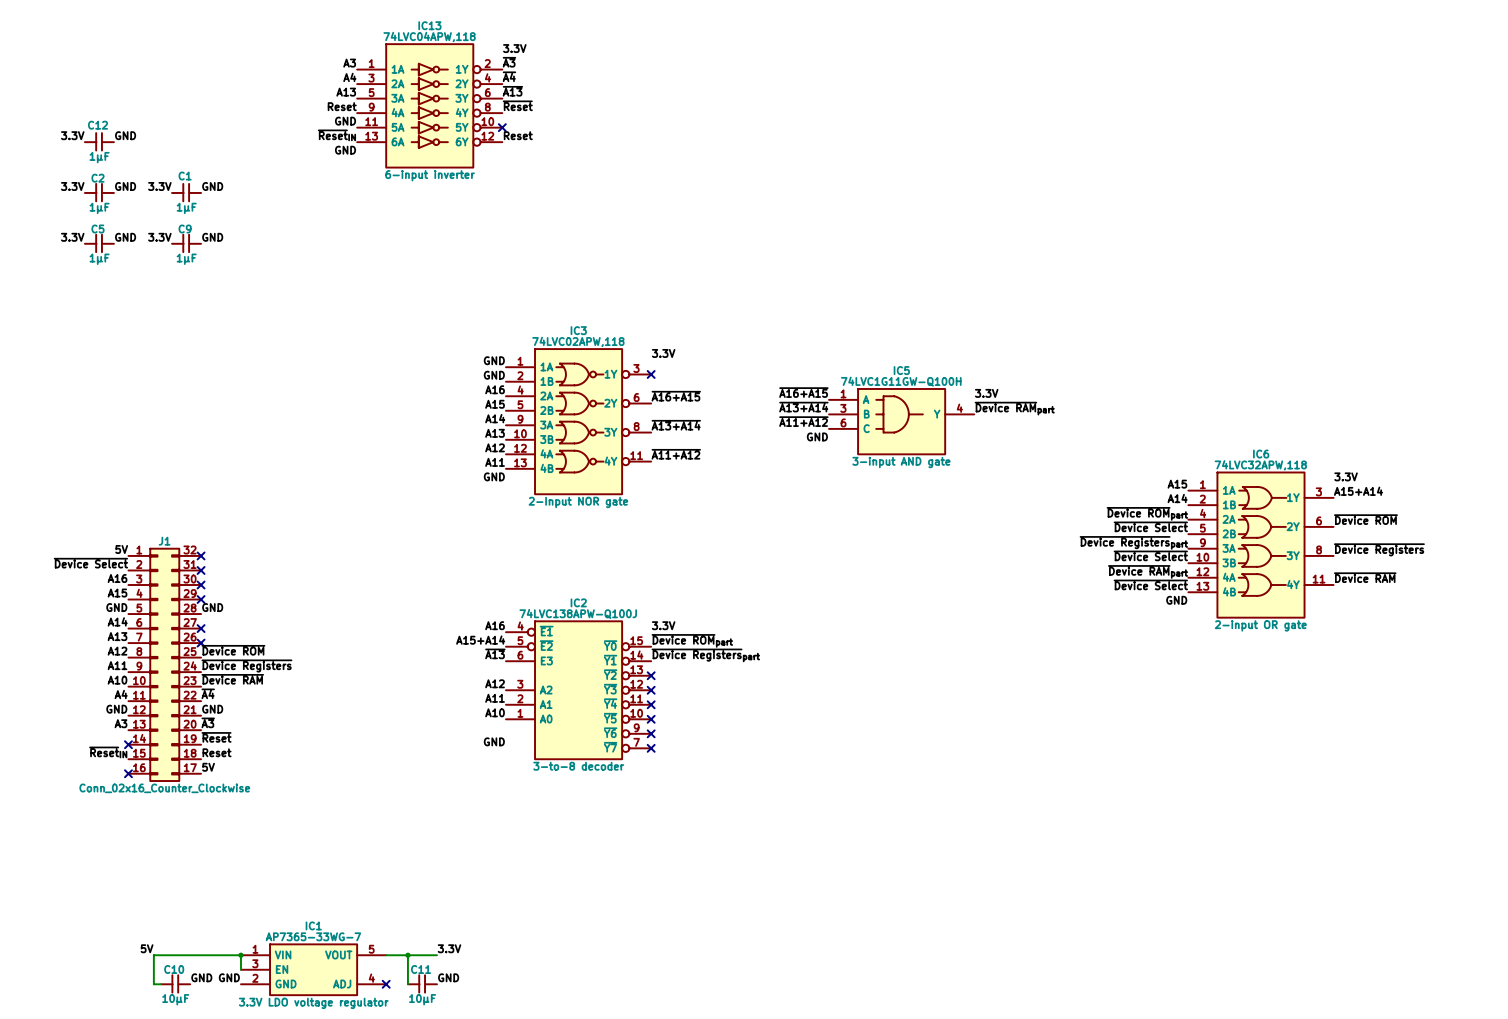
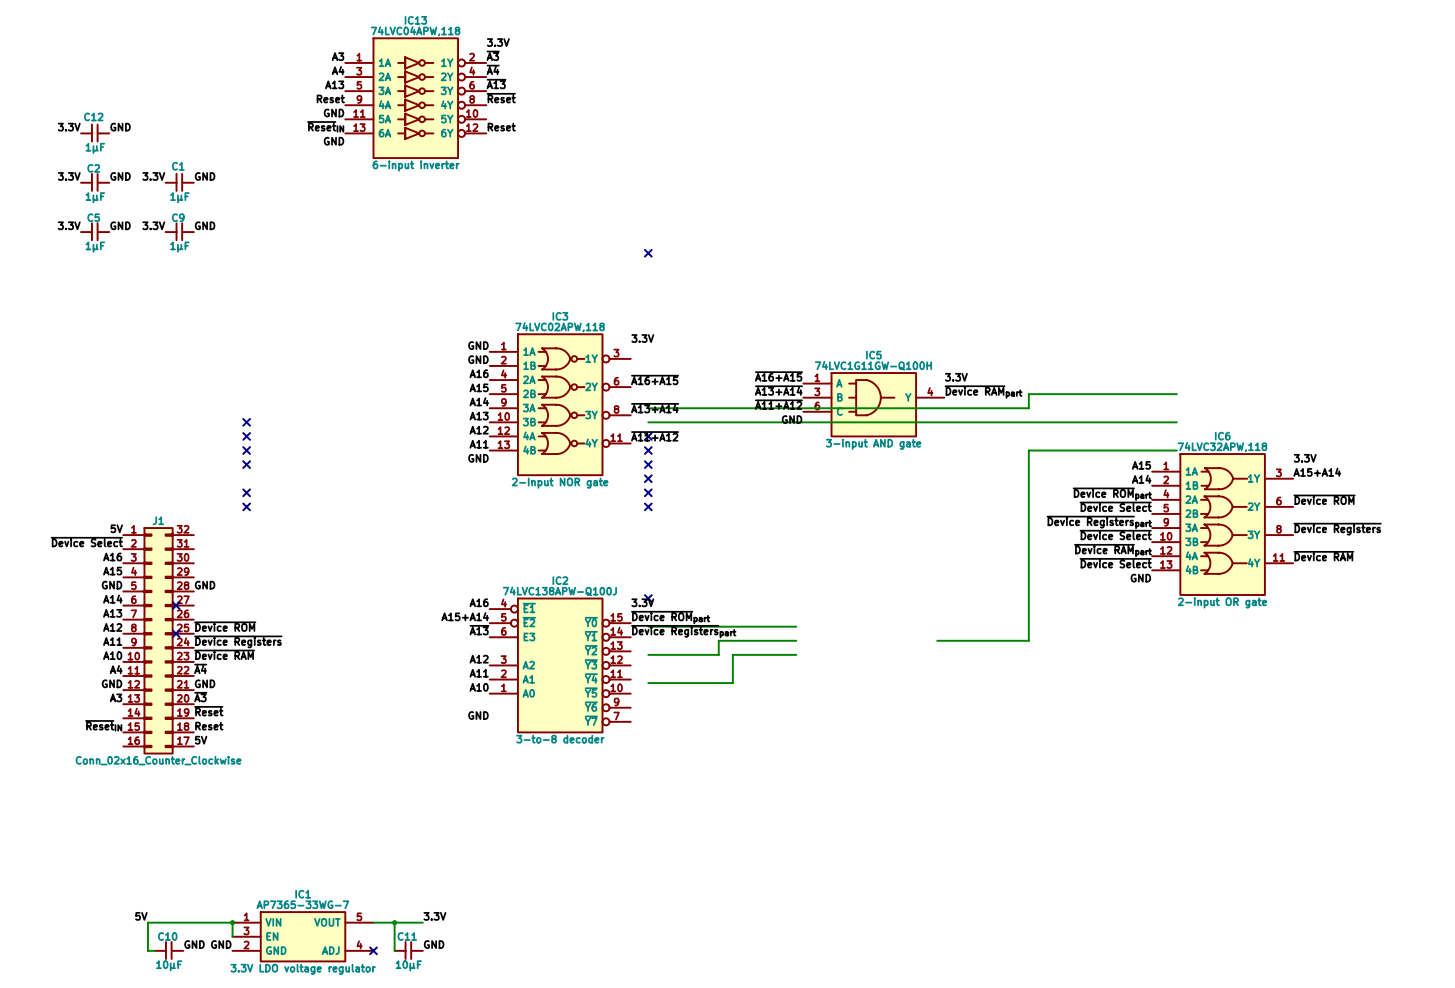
no-connect mark: (502, 127) -> none
no-connect mark: none -> (648, 253)
no-connect mark: (651, 374) -> none
wire: none -> (1176, 394) (1028, 394) (1028, 408) (648, 408)
no-connect mark: none -> (246, 422)
wire: none -> (648, 422) (1176, 422)
no-connect mark: none -> (246, 436)
no-connect mark: none -> (648, 436)
no-connect mark: none -> (246, 450)
no-connect mark: none -> (648, 450)
wire: none -> (1176, 450) (1028, 450) (1028, 640) (937, 640)
no-connect mark: none -> (246, 464)
no-connect mark: none -> (648, 464)
no-connect mark: none -> (648, 478)
no-connect mark: none -> (246, 492)
no-connect mark: none -> (648, 492)
no-connect mark: none -> (246, 506)
no-connect mark: none -> (648, 506)
no-connect mark: (201, 555) -> none
no-connect mark: (201, 570) -> none
no-connect mark: (201, 585) -> none
no-connect mark: (201, 599) -> none
no-connect mark: none -> (648, 598)
no-connect mark: none -> (176, 605)
no-connect mark: (201, 628) -> none
no-connect mark: (201, 643) -> none
wire: none -> (648, 626) (796, 626)
no-connect mark: none -> (176, 633)
wire: none -> (796, 640) (718, 640) (718, 654) (648, 654)
no-connect mark: (651, 675) -> none
wire: none -> (796, 654) (732, 654) (732, 683) (648, 683)
no-connect mark: (651, 690) -> none
no-connect mark: (651, 704) -> none
no-connect mark: (651, 719) -> none
no-connect mark: (651, 733) -> none
no-connect mark: (128, 744) -> none
no-connect mark: (651, 748) -> none
no-connect mark: (128, 773) -> none

